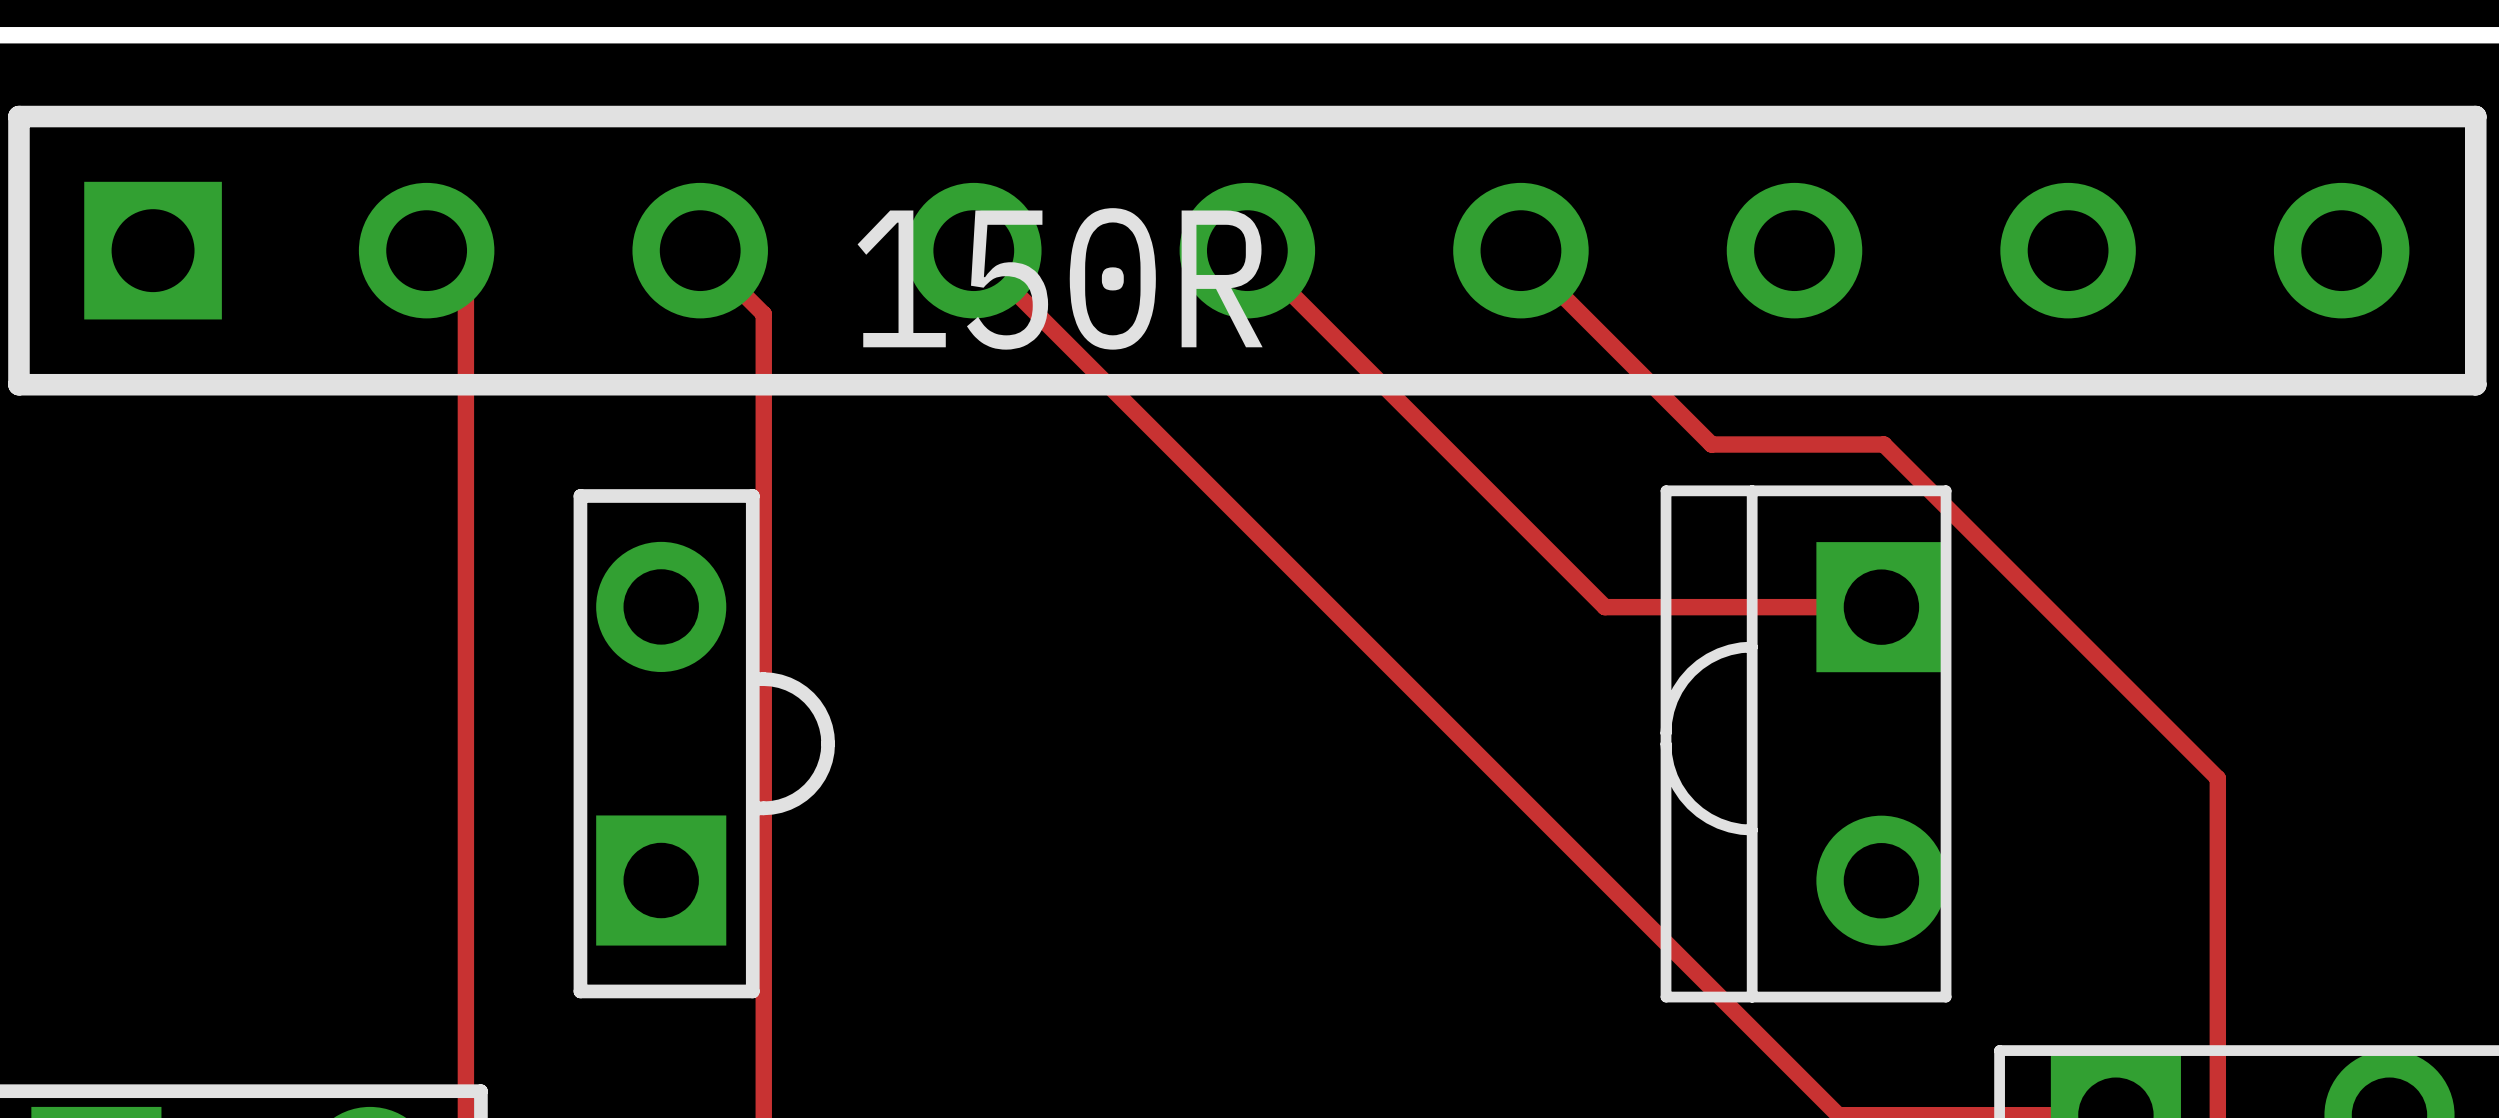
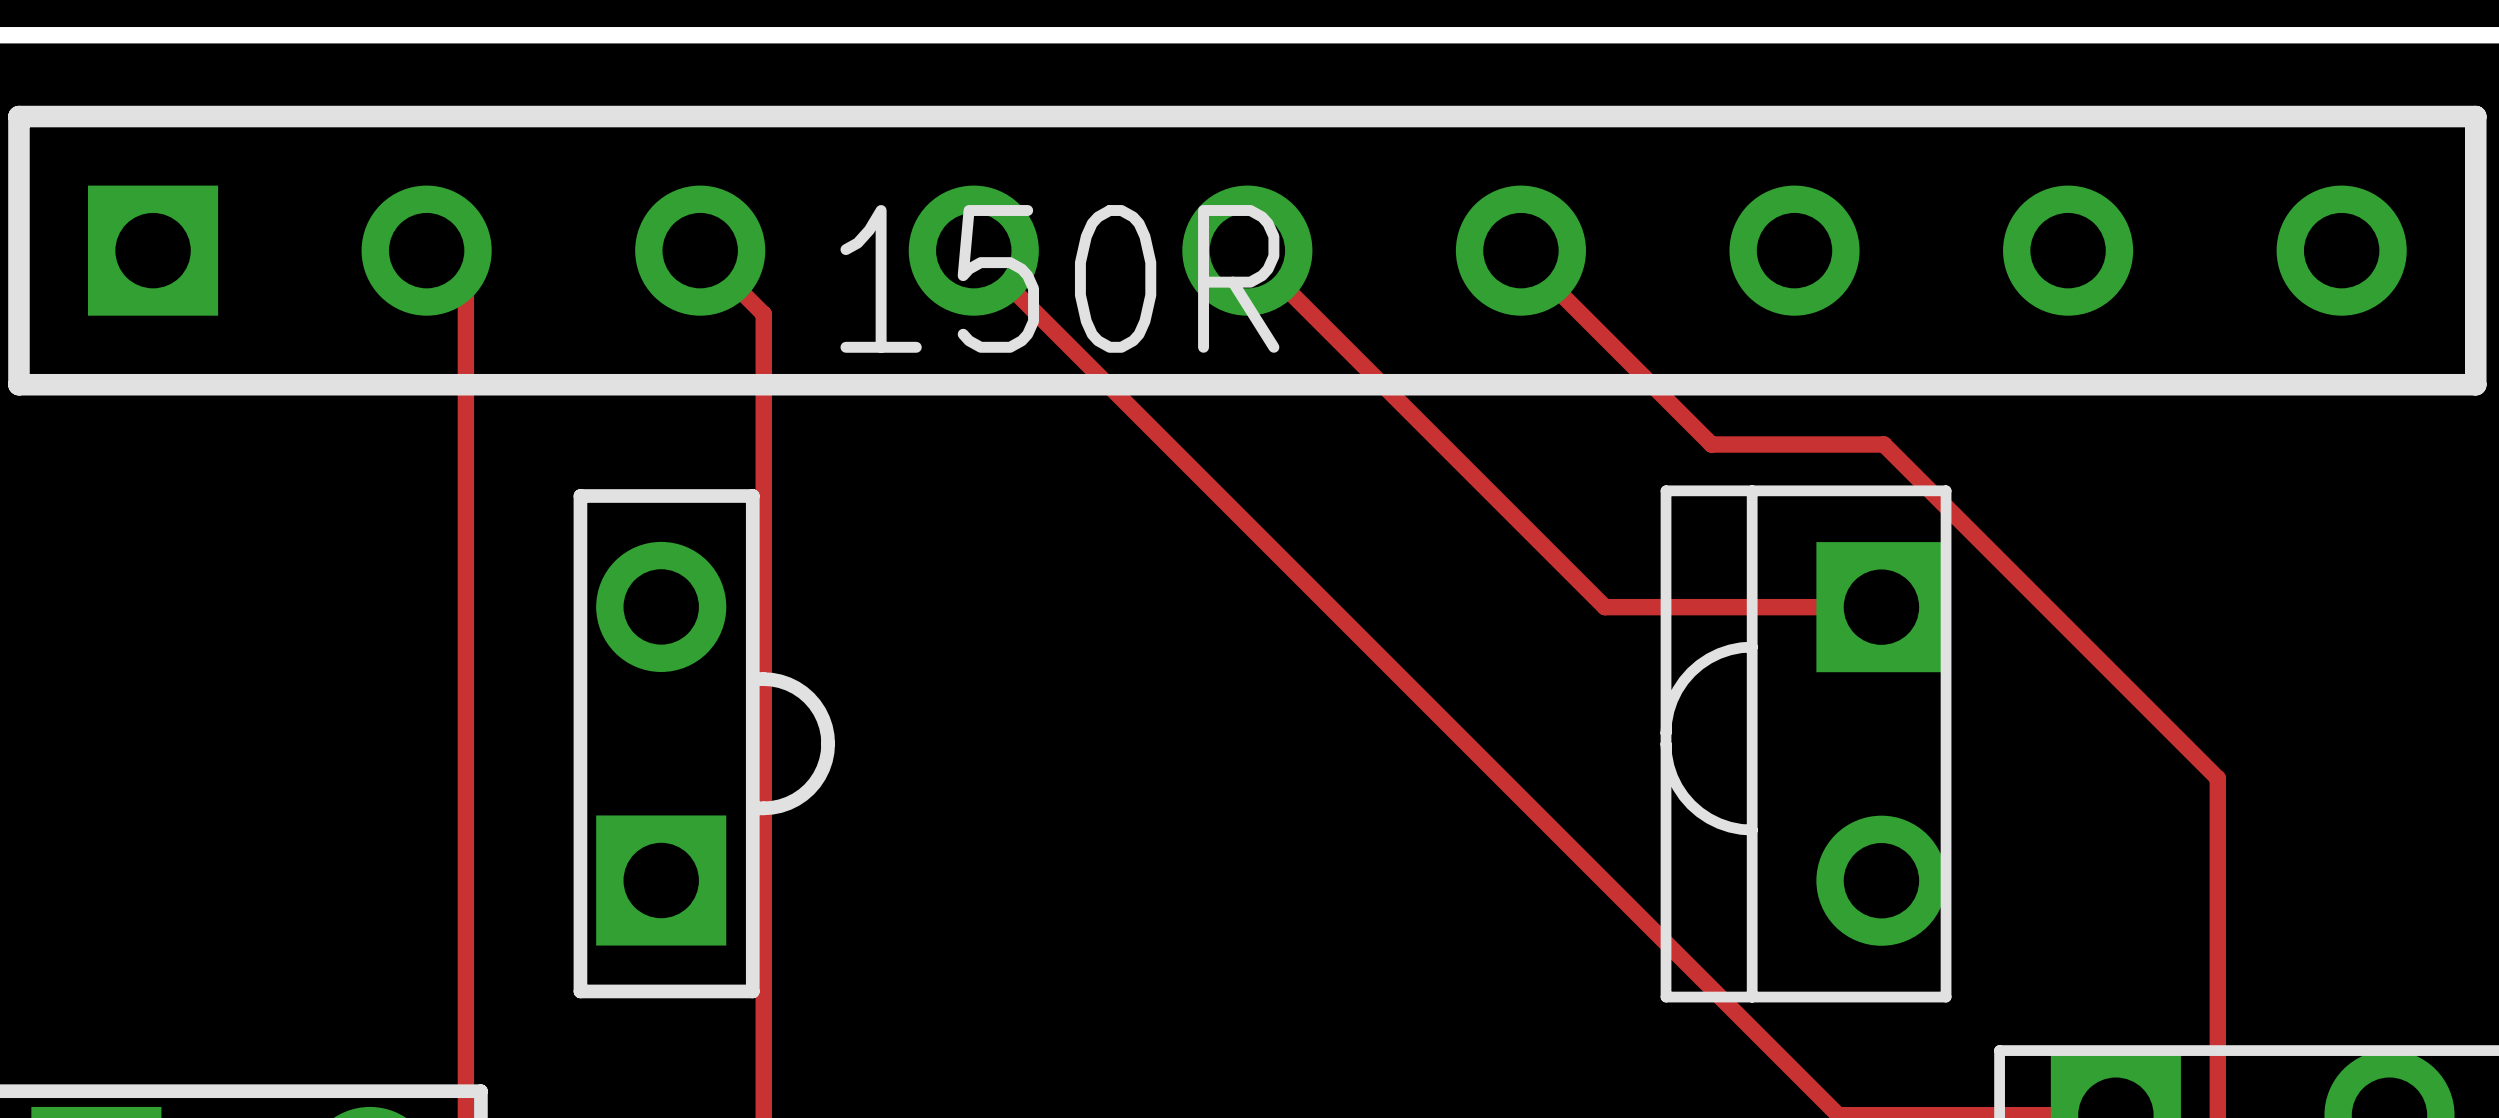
150R footprint: [8, 105, 2487, 396] -> [8, 105, 2487, 396]

